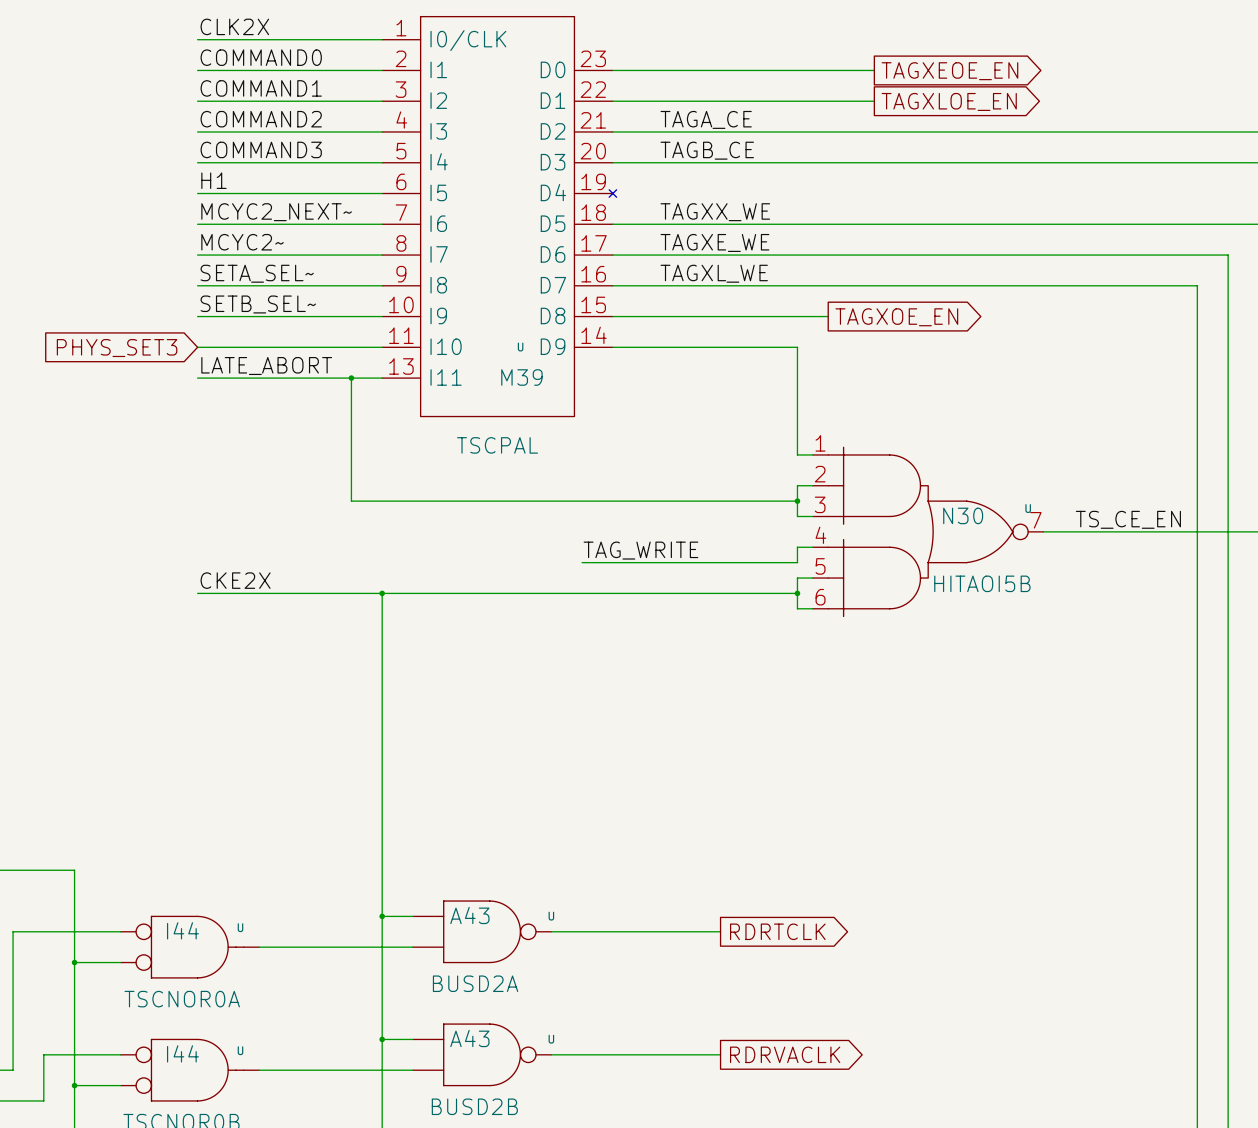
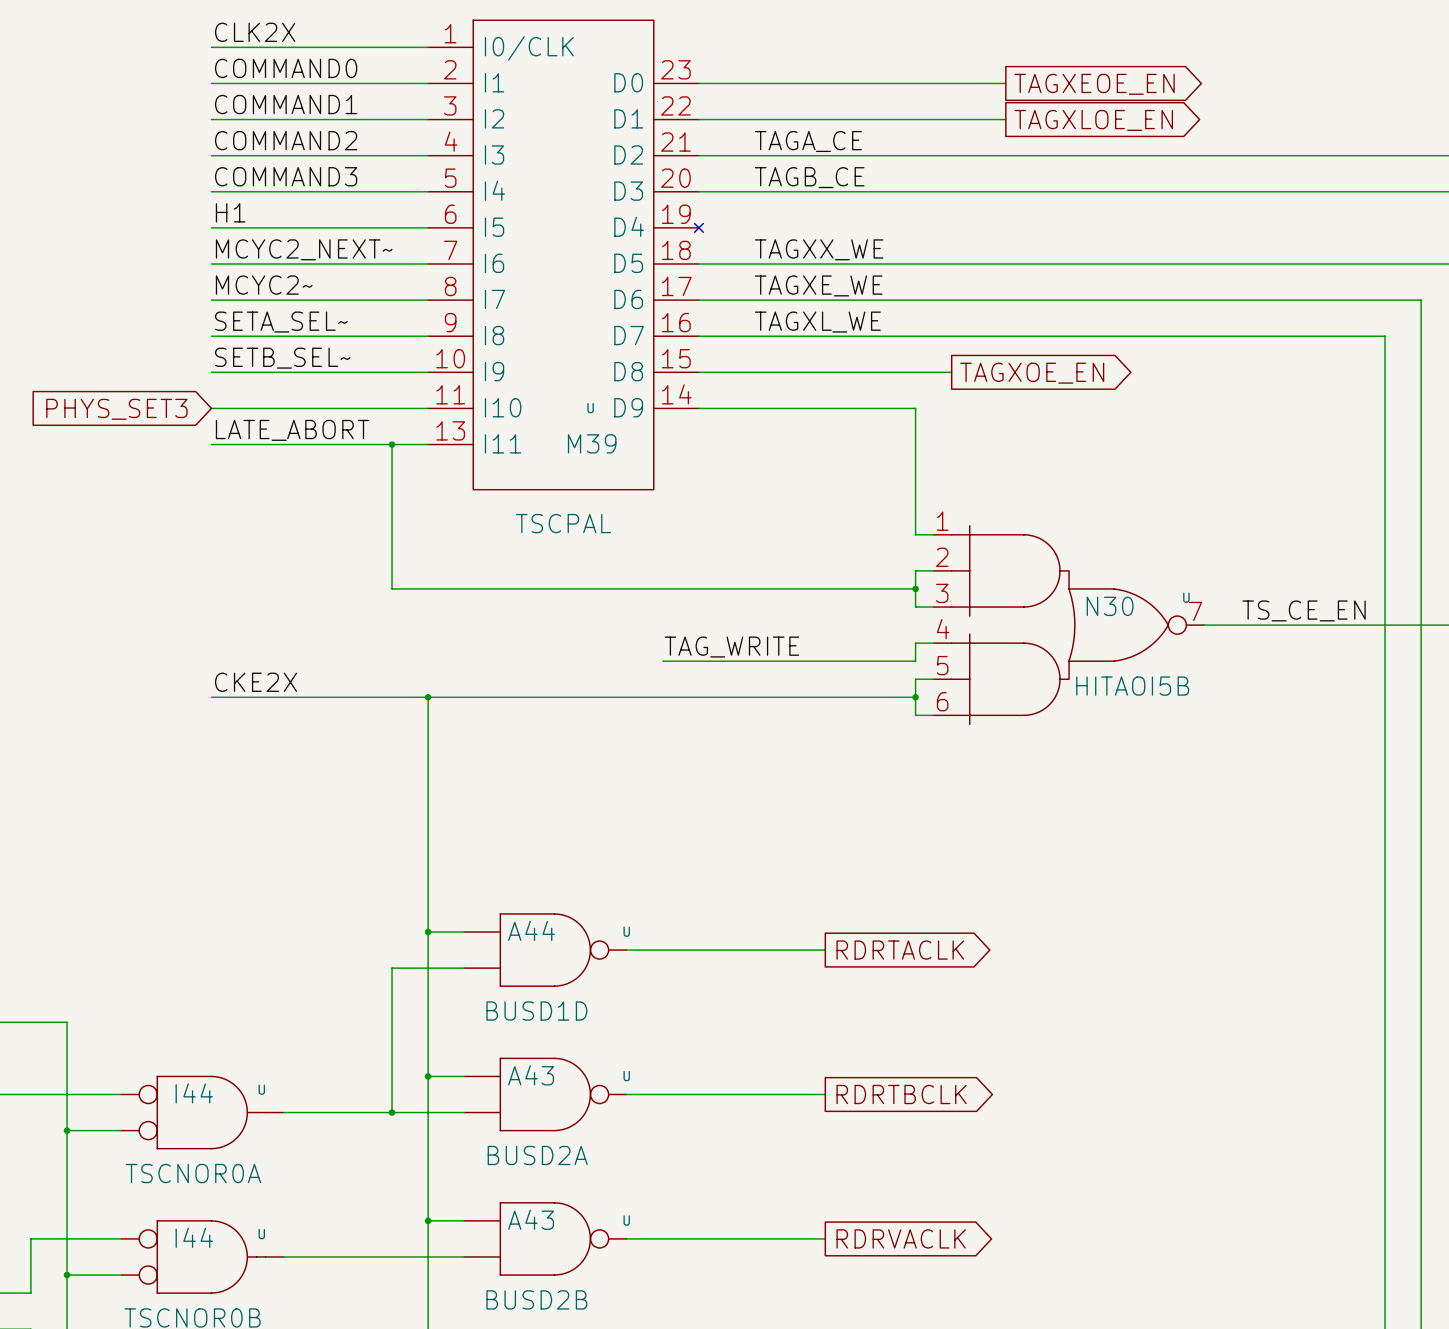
wire: none -> (428, 932) (464, 932)
junction: none -> (428, 932)
U: none -> (545, 950)
wire: none -> (626, 950) (825, 950)
global label: none -> RDRTACLK (900, 950)
wire: none -> (464, 968) (392, 968) (392, 1112)
global label: RDRTCLK (777, 931) -> RDRTBCLK (901, 1094)
junction: none -> (392, 1112)

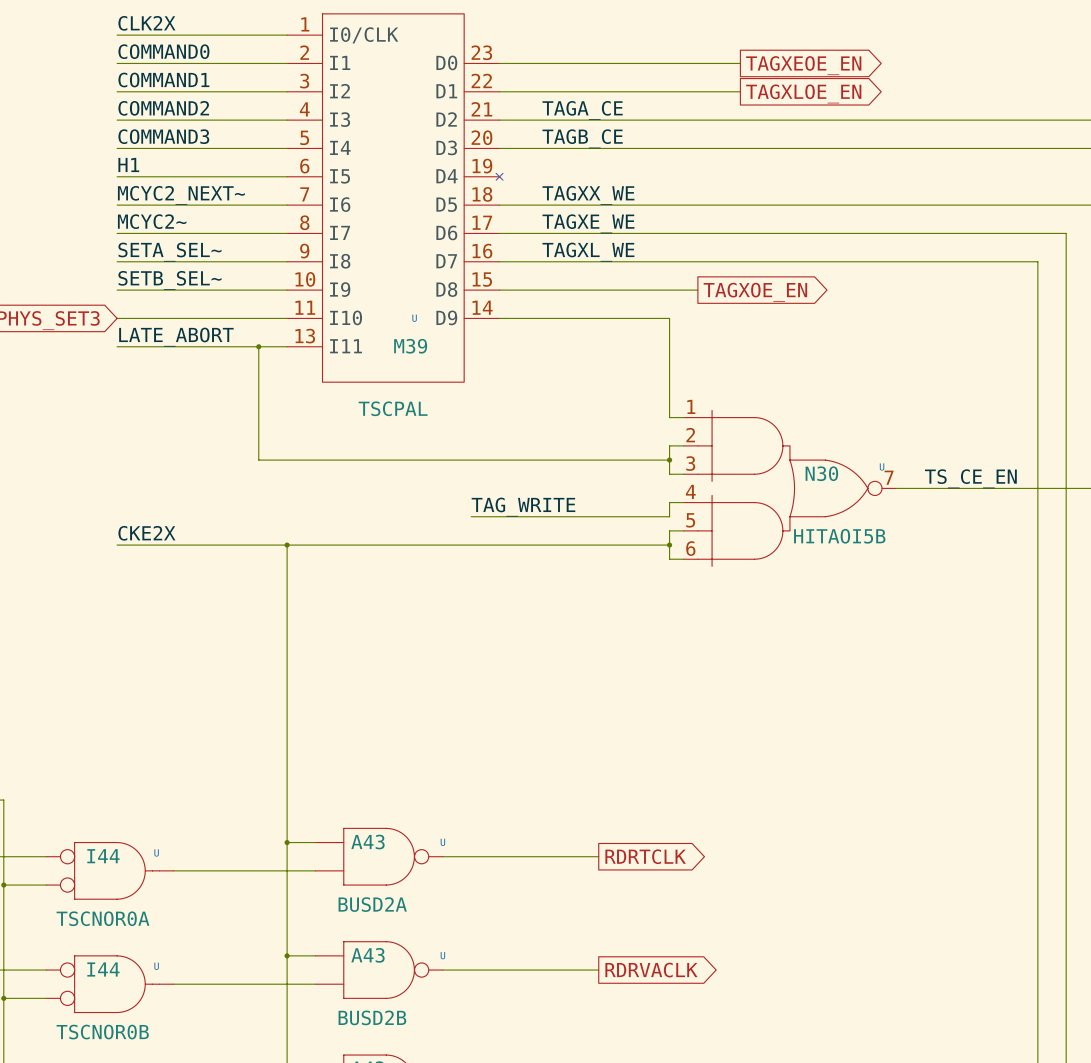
wire: (428, 932) (464, 932) -> none
junction: (428, 932) -> none
U: (545, 950) -> none
wire: (626, 950) (825, 950) -> none
global label: RDRTACLK (900, 950) -> none
wire: (464, 968) (392, 968) (392, 1112) -> none
global label: RDRTBCLK (901, 1094) -> RDRTCLK (645, 856)
junction: (392, 1112) -> none

